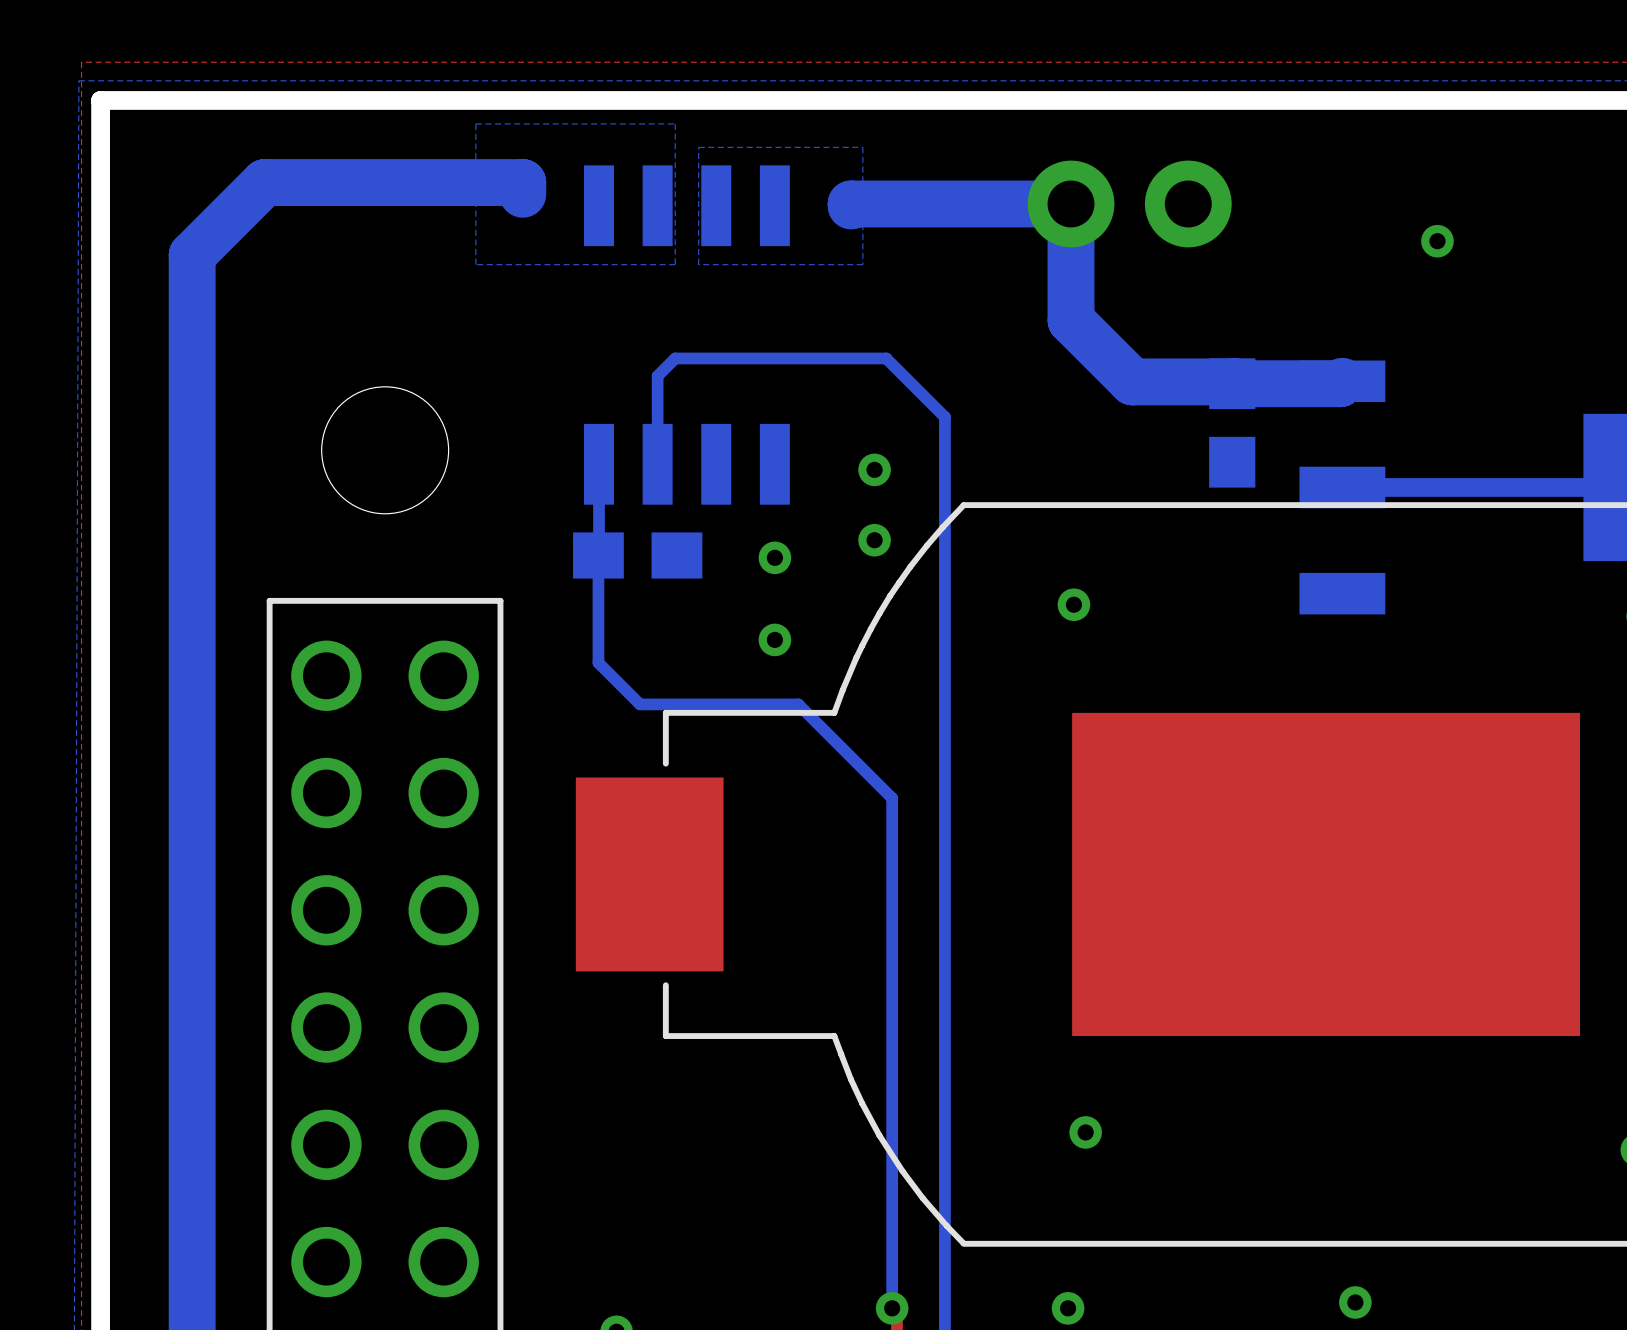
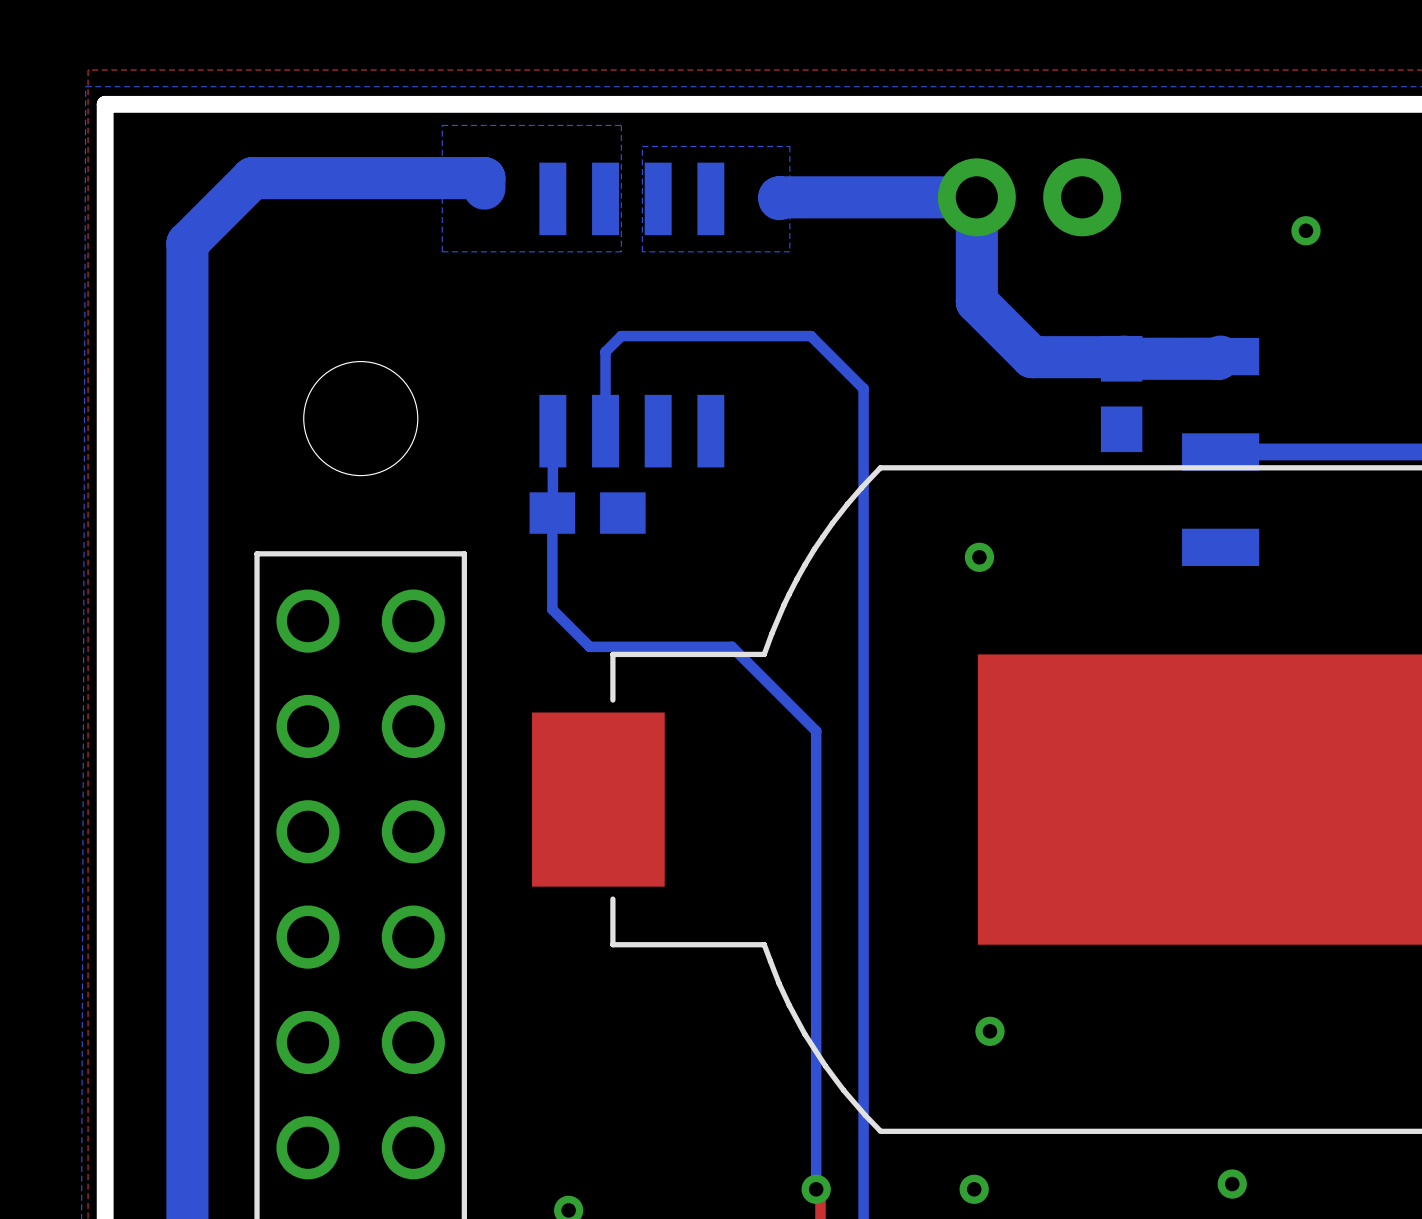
via: (874, 469) -> none
via: (874, 540) -> none
via: (774, 557) -> none
via: (774, 639) -> none

